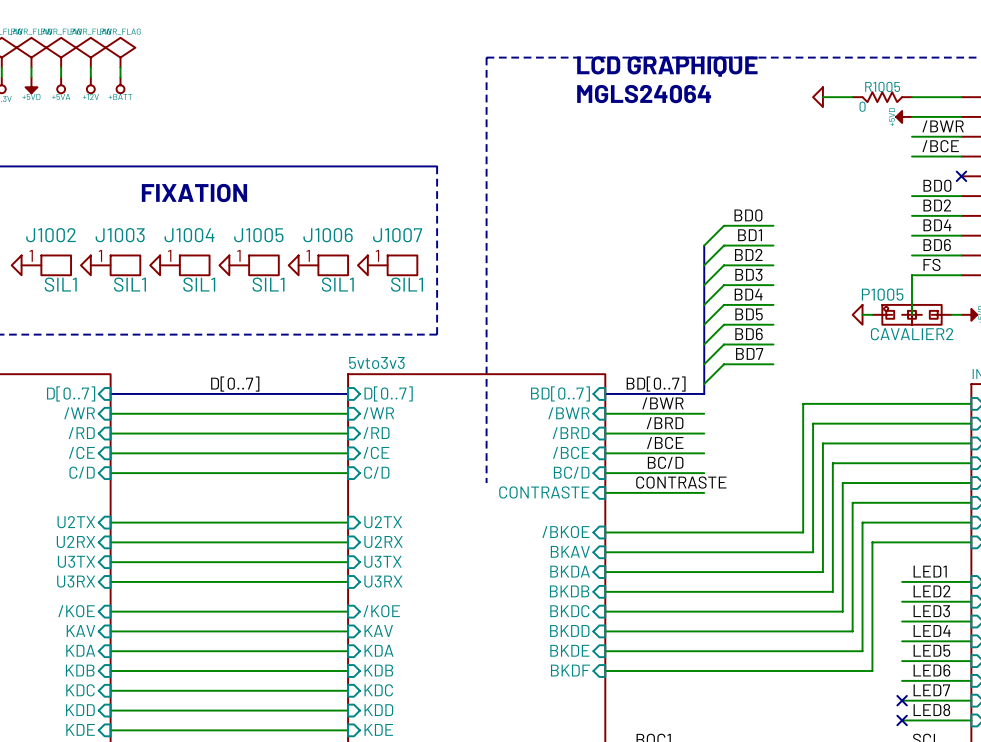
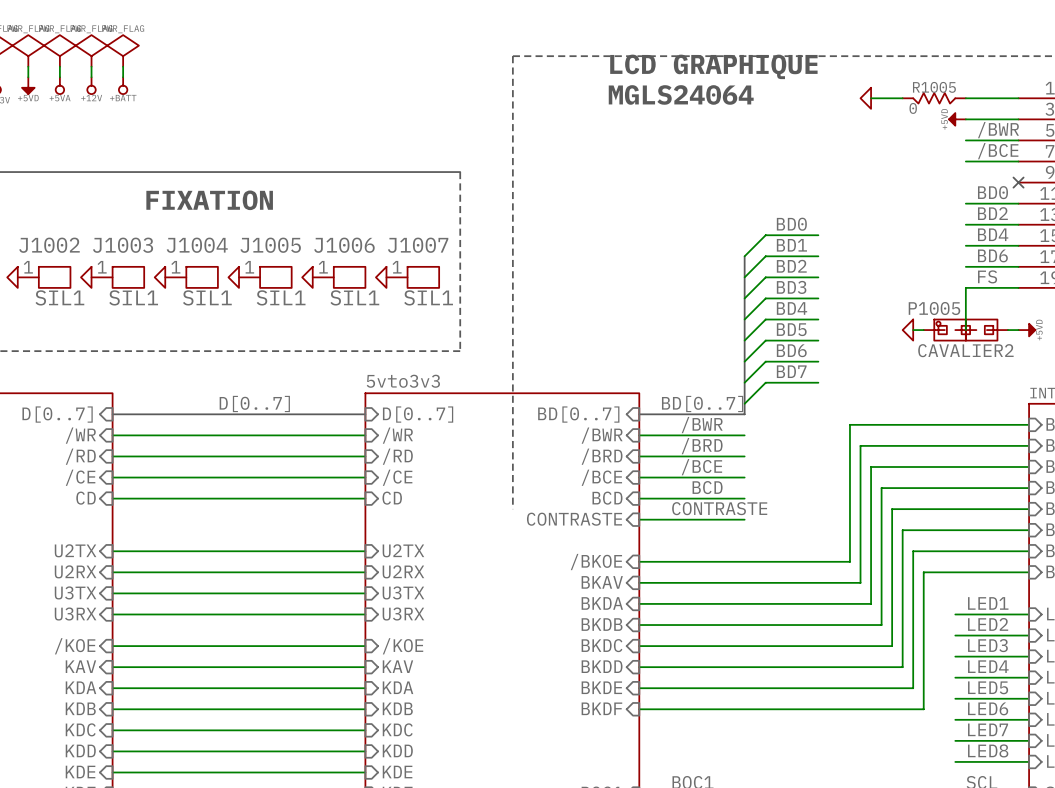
label: BC/D (665, 462) -> BCD (707, 487)
sheet pin: C/D (82, 472) -> CD (86, 498)
sheet pin: C/D (376, 472) -> CD (392, 498)
sheet pin: BC/D (571, 472) -> BCD (607, 498)
no-connect mark: (902, 700) -> none
no-connect mark: (902, 720) -> none

